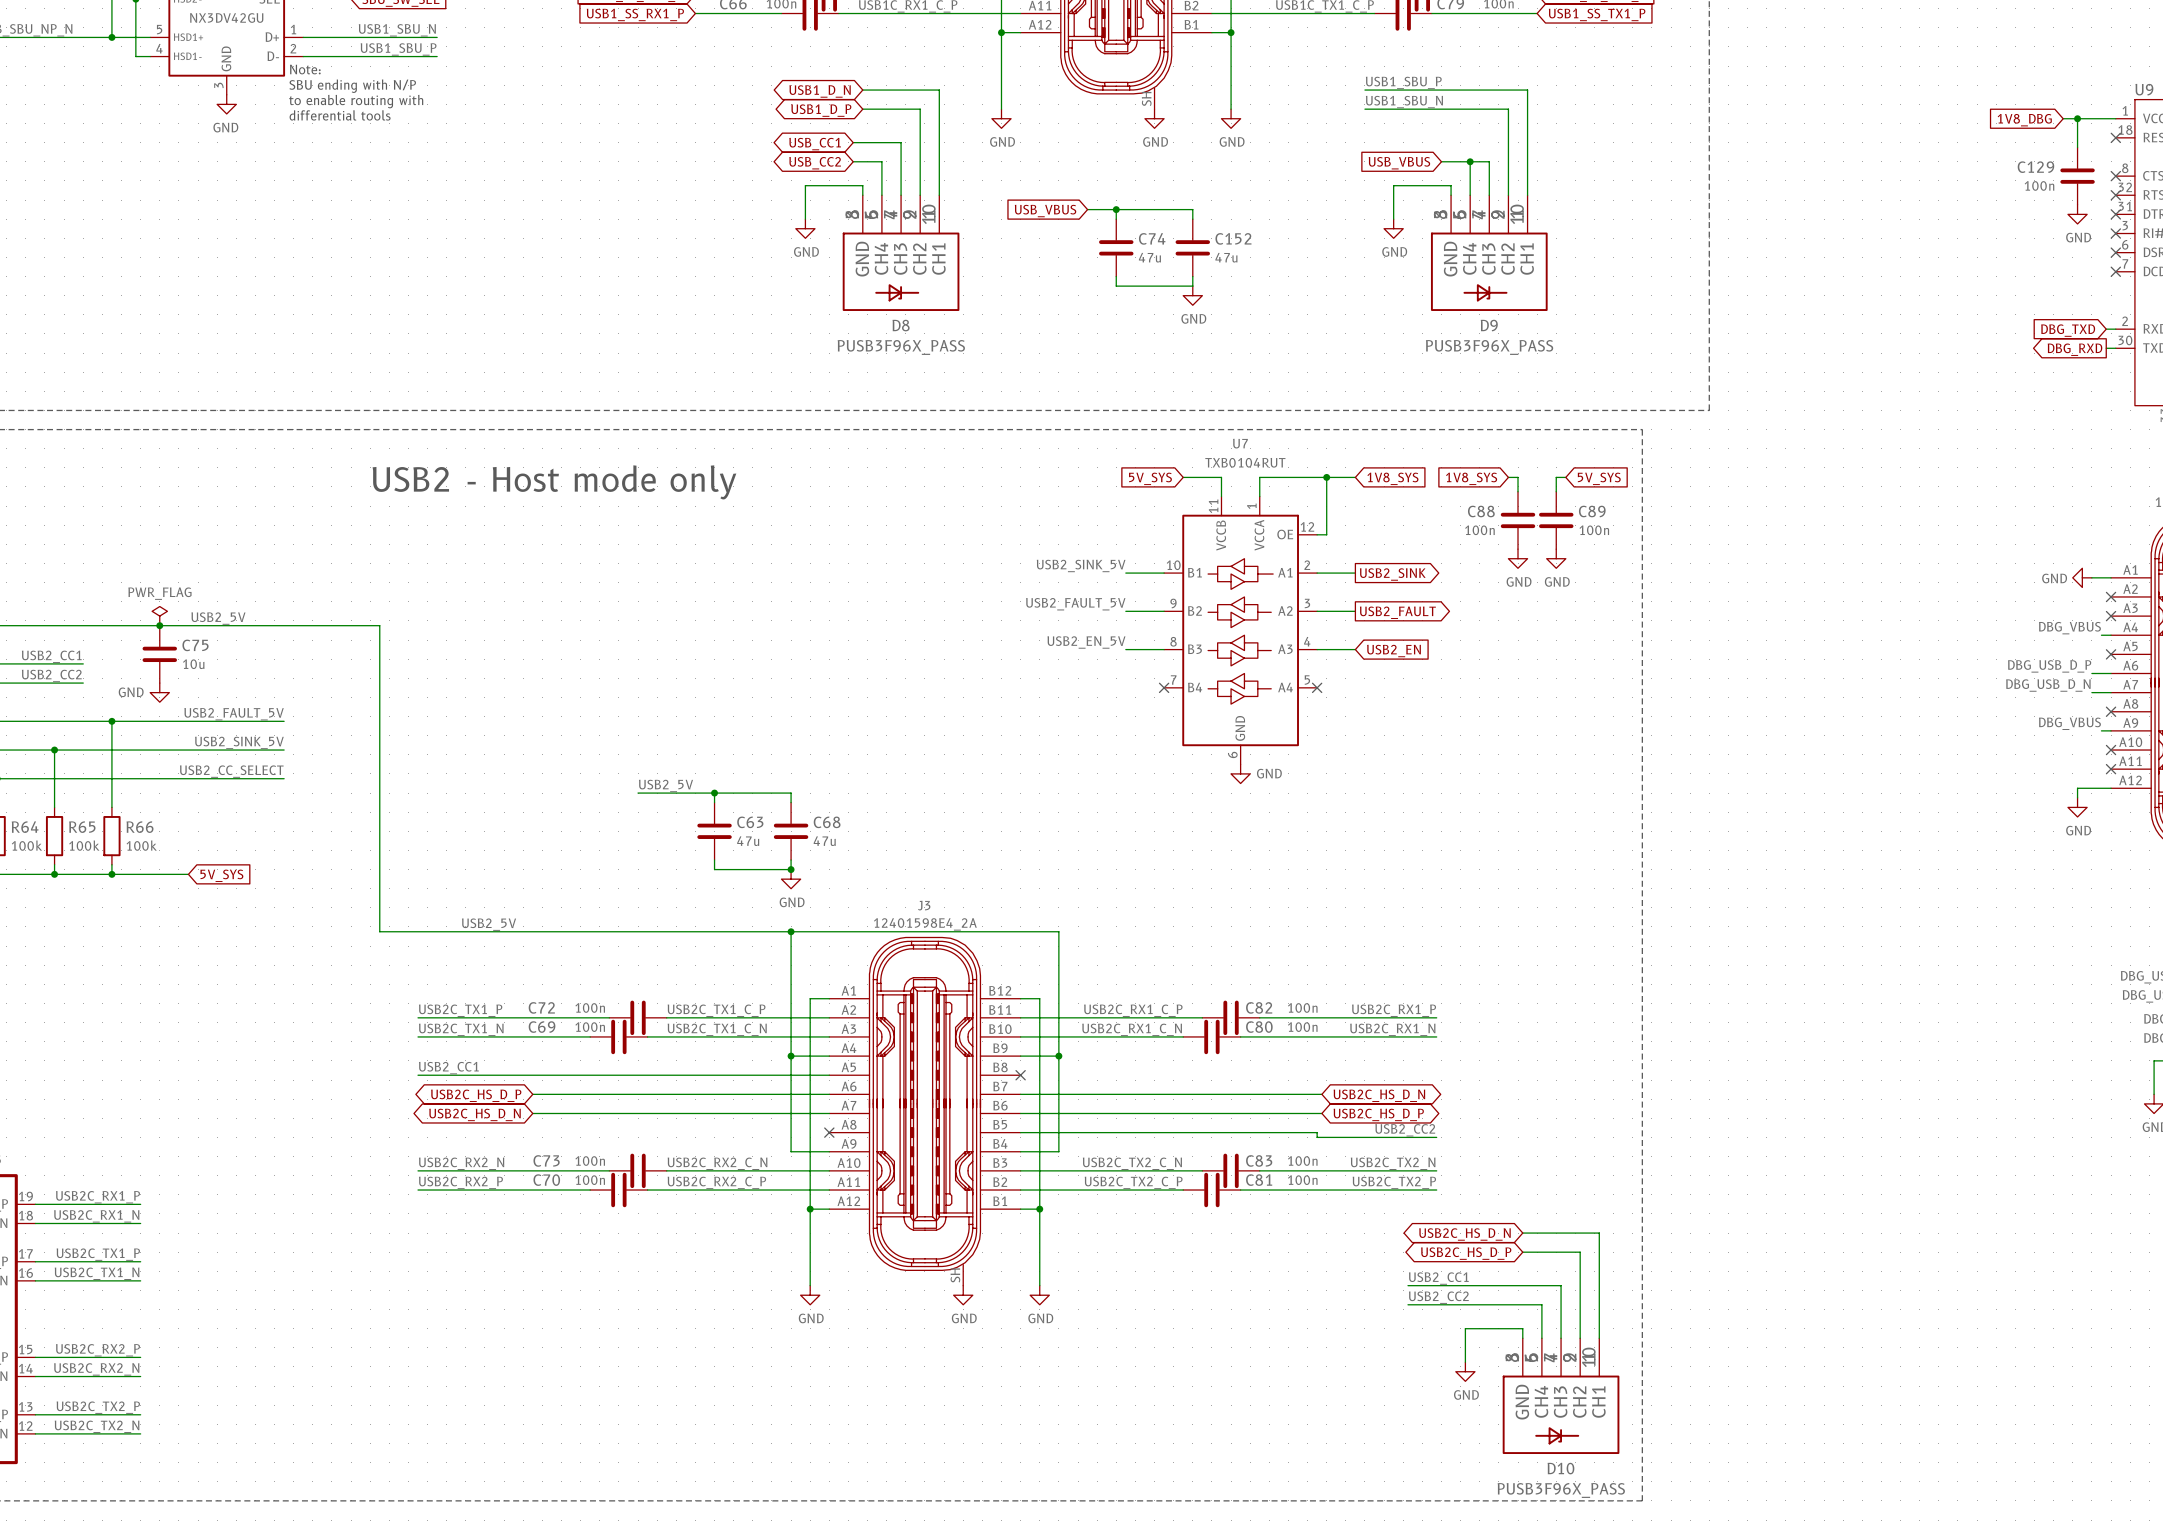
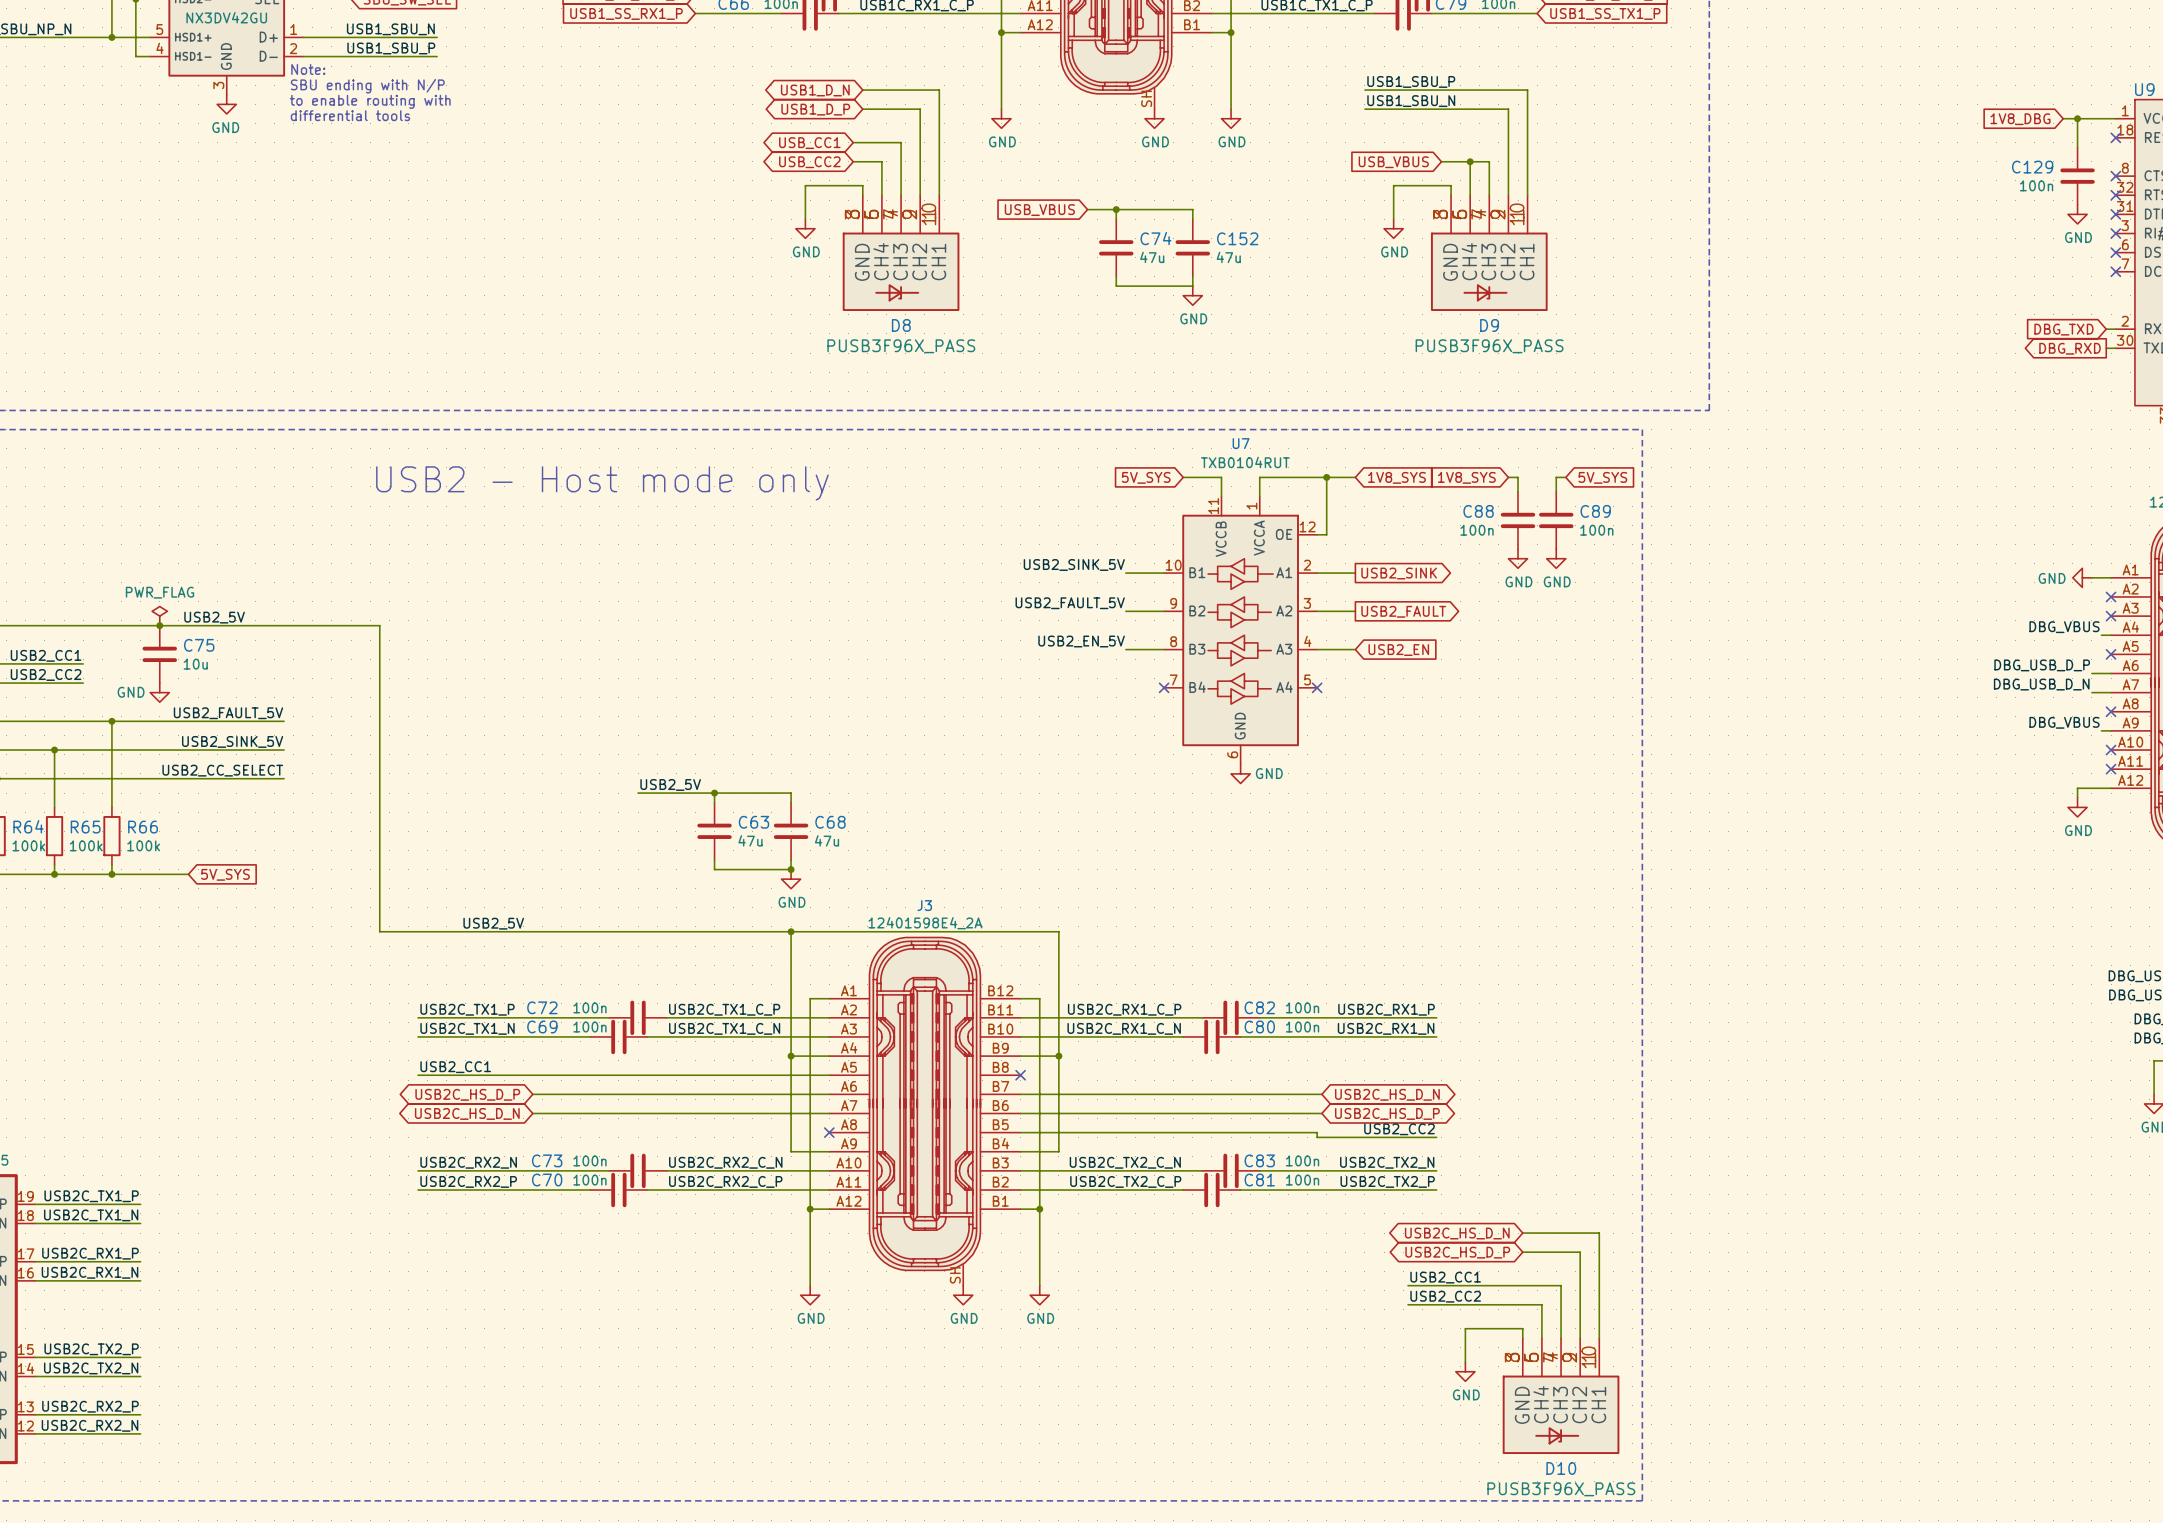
label: USB2C_RX1_P (97, 1197) -> USB2C_TX1_P (91, 1196)
label: USB2C_RX1_N (96, 1216) -> USB2C_TX1_N (91, 1215)
label: USB2C_TX1_P (98, 1254) -> USB2C_RX1_P (90, 1253)
label: USB2C_TX1_N (97, 1273) -> USB2C_RX1_N (90, 1272)
label: USB2C_RX2_P (97, 1350) -> USB2C_TX2_P (91, 1349)
label: USB2C_RX2_N (96, 1369) -> USB2C_TX2_N (91, 1368)
label: USB2C_TX2_P (98, 1407) -> USB2C_RX2_P (90, 1406)
label: USB2C_TX2_N (97, 1426) -> USB2C_RX2_N (90, 1425)

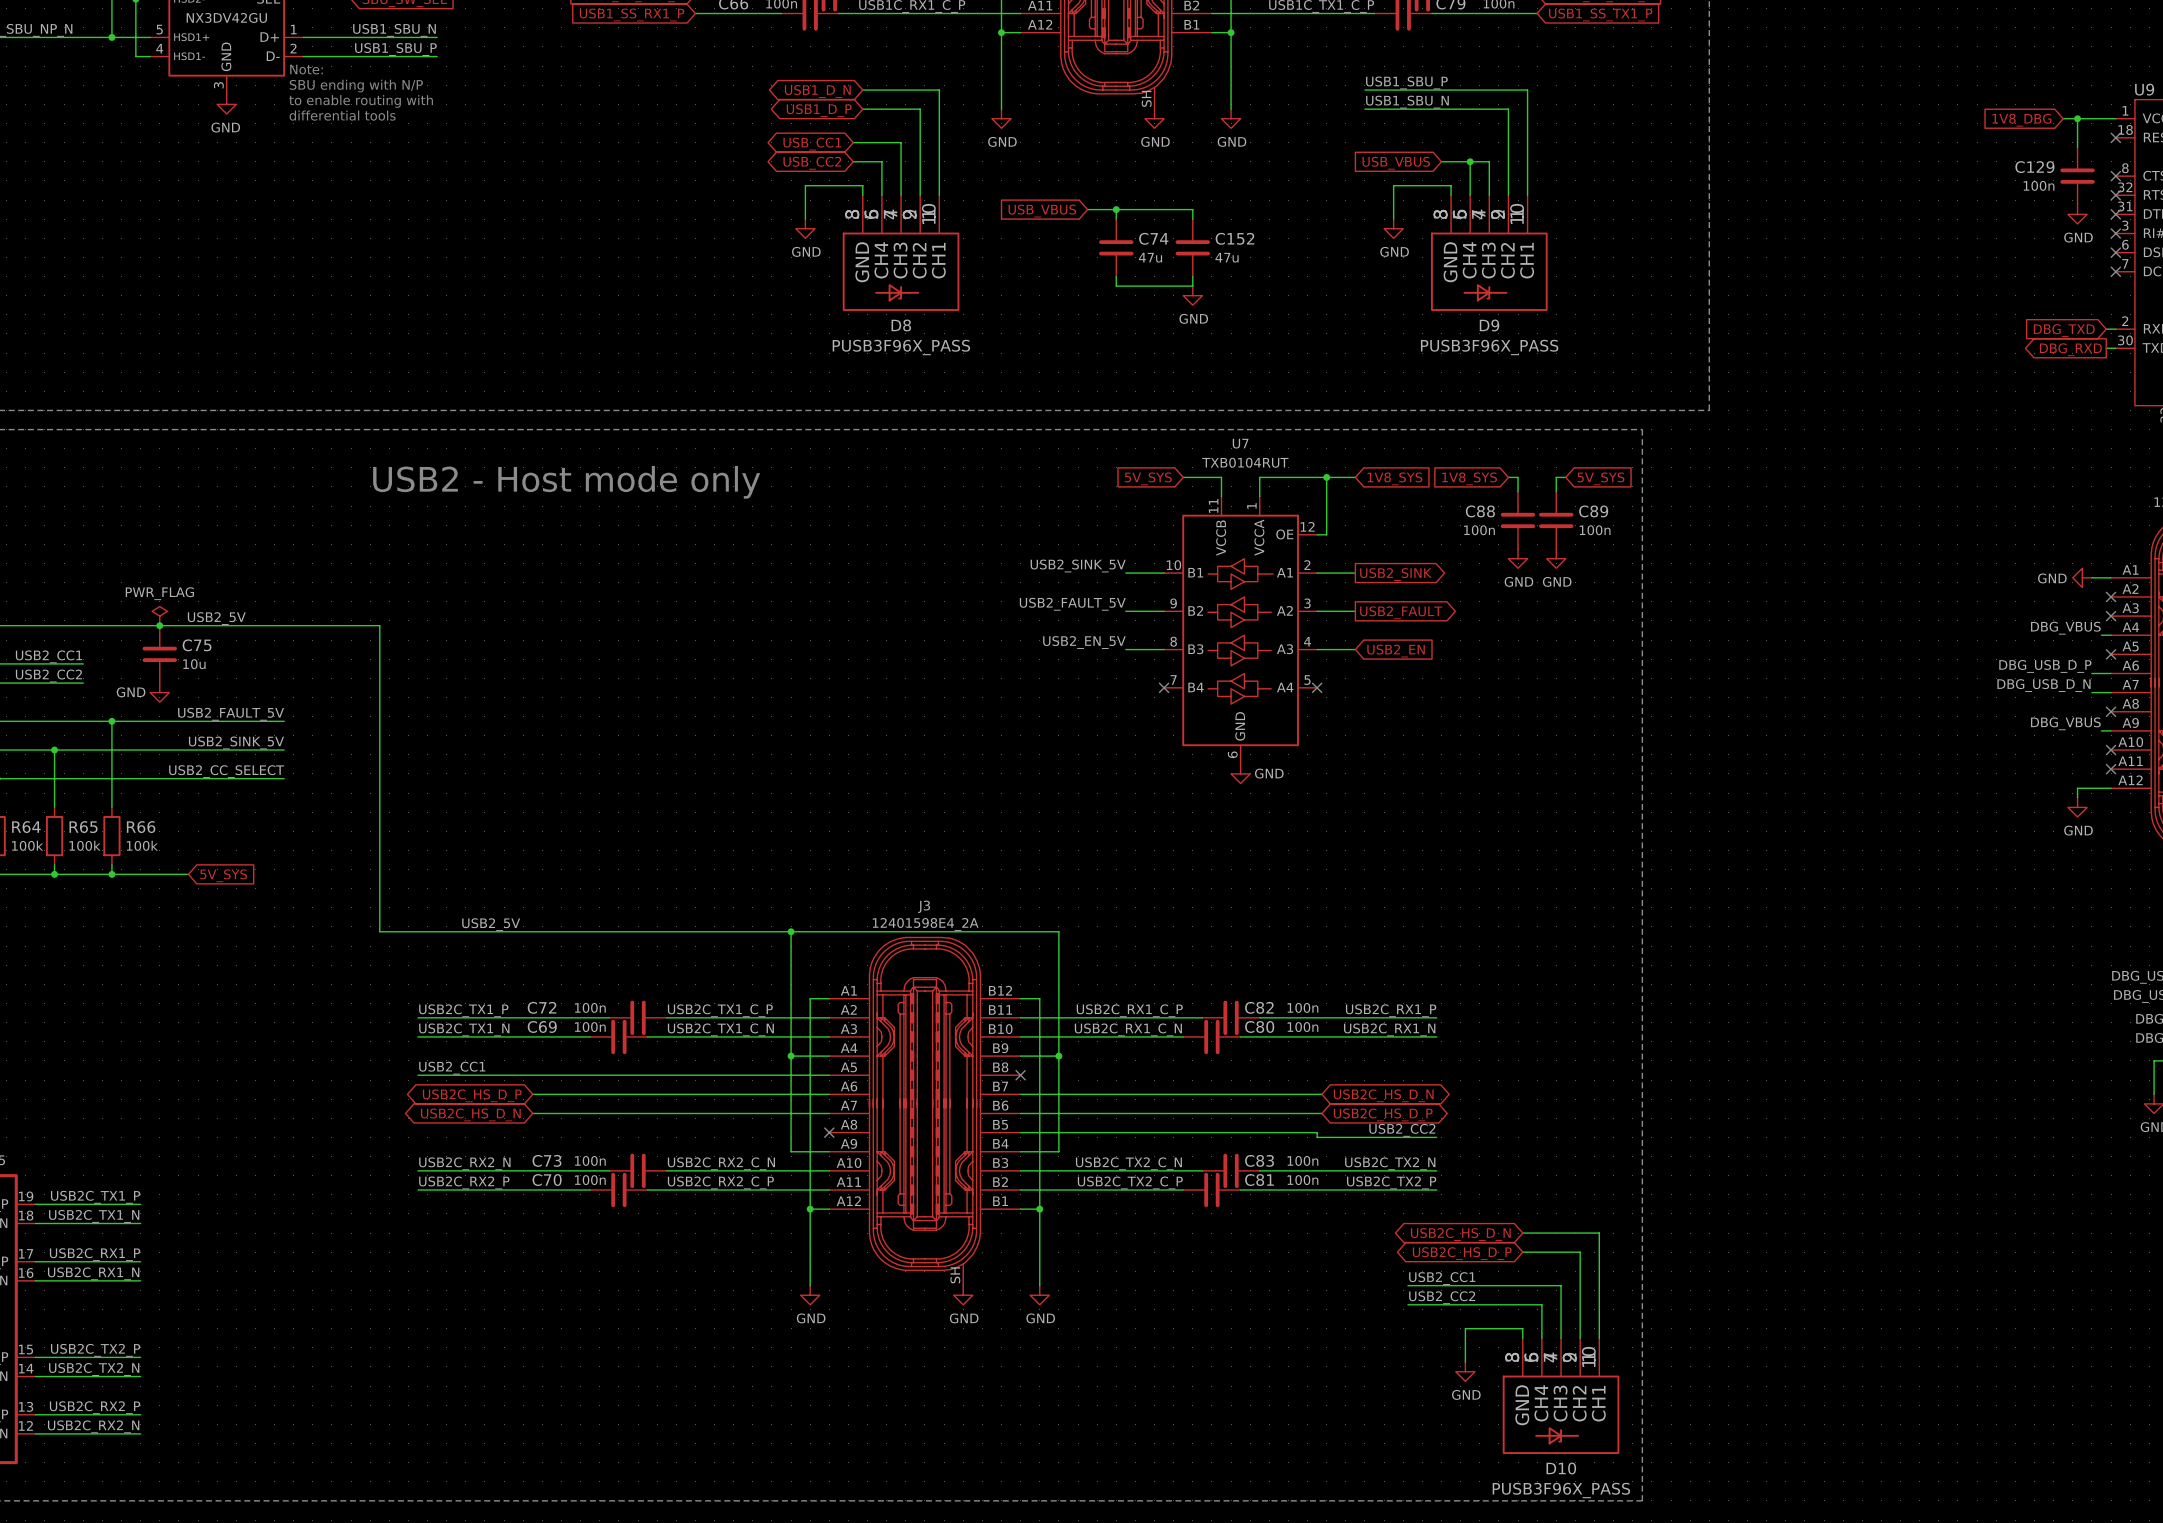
label: USB2_5V (670, 784) -> none
wire: (638, 793) (791, 793) (791, 802) -> none
wire: (714, 793) (714, 802) -> none
junction: (714, 793) -> none
C63: (714, 831) -> none
C68: (791, 831) -> none
wire: (714, 860) (714, 869) (791, 869) (791, 860) -> none
junction: (791, 869) -> none
power symbol: GND (791, 879) -> none

